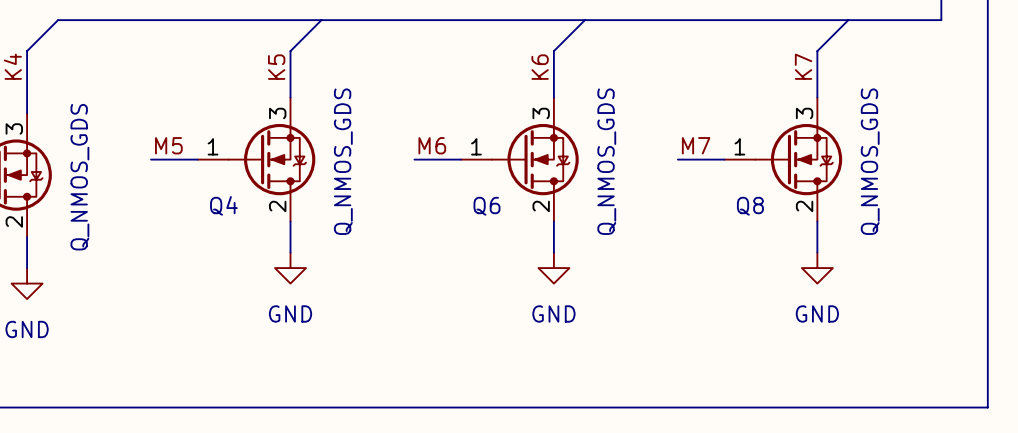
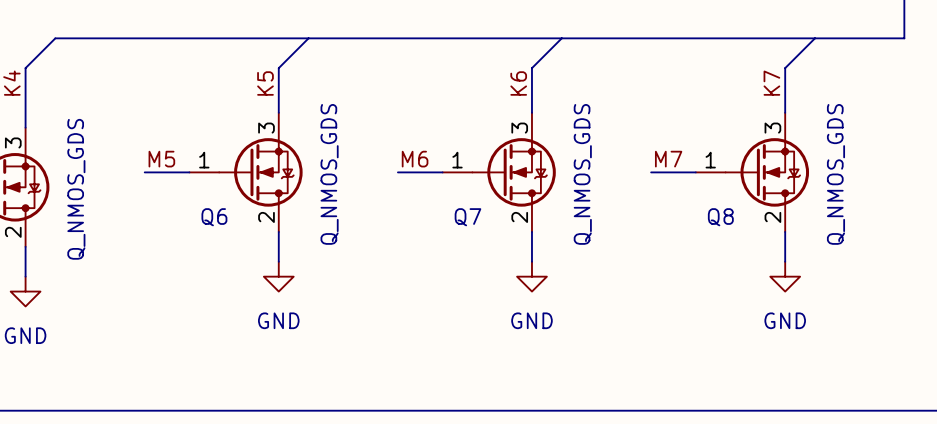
Q4 name: Q4 (223, 205) -> Q6 (214, 217)
Q6 name: Q6 (486, 206) -> Q7 (467, 217)

